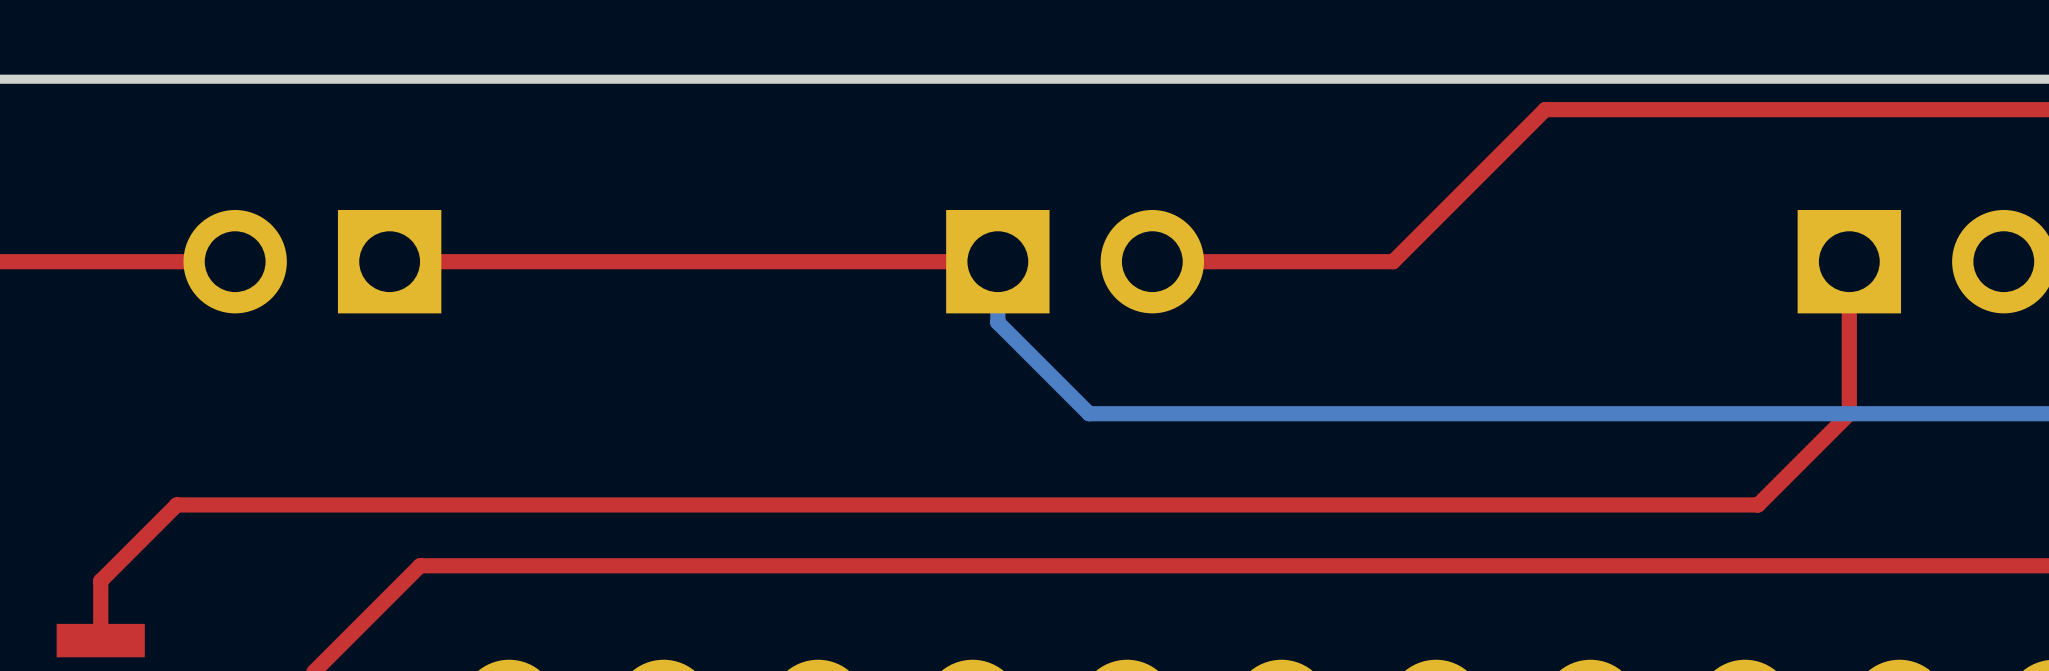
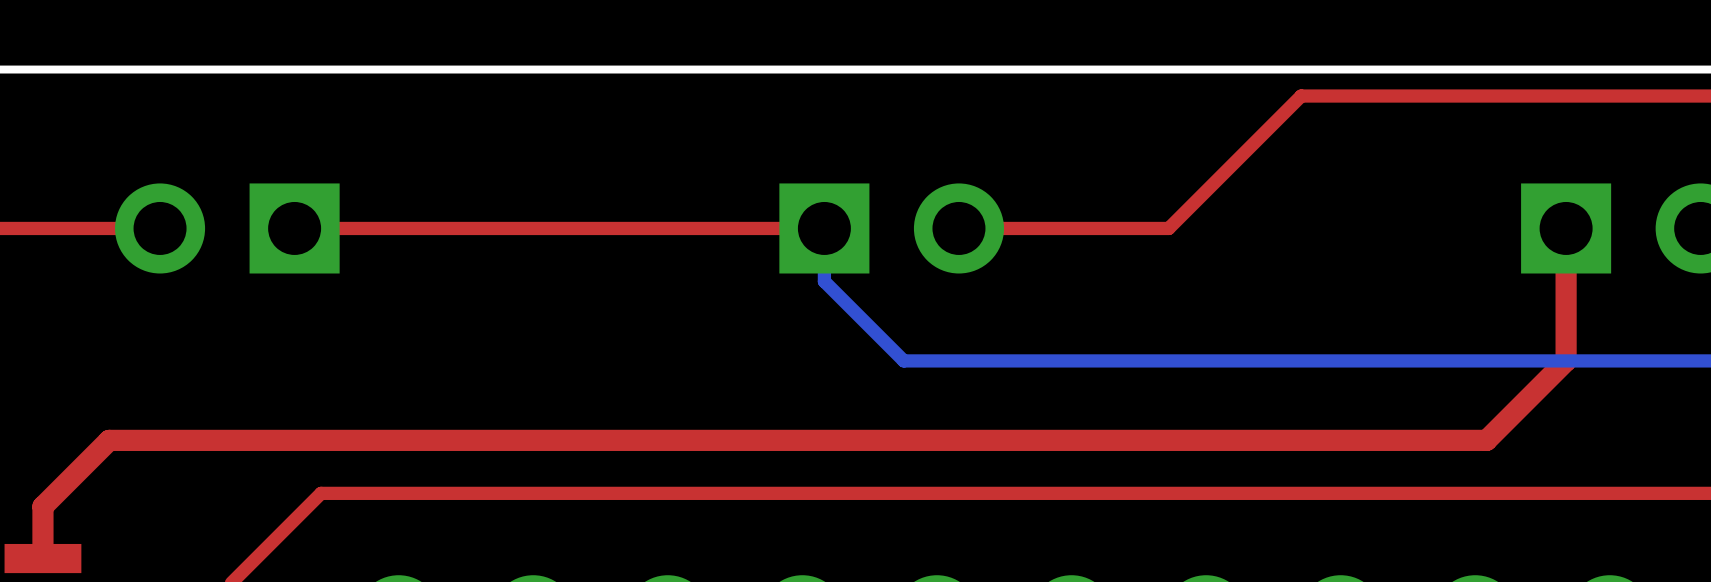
top track width: thin (1849, 261) (1849, 413) (1758, 504) (176, 504) (100, 580) (100, 640) -> thick (1566, 228) (1566, 360) (1486, 440) (109, 440) (42, 506) (42, 558)

